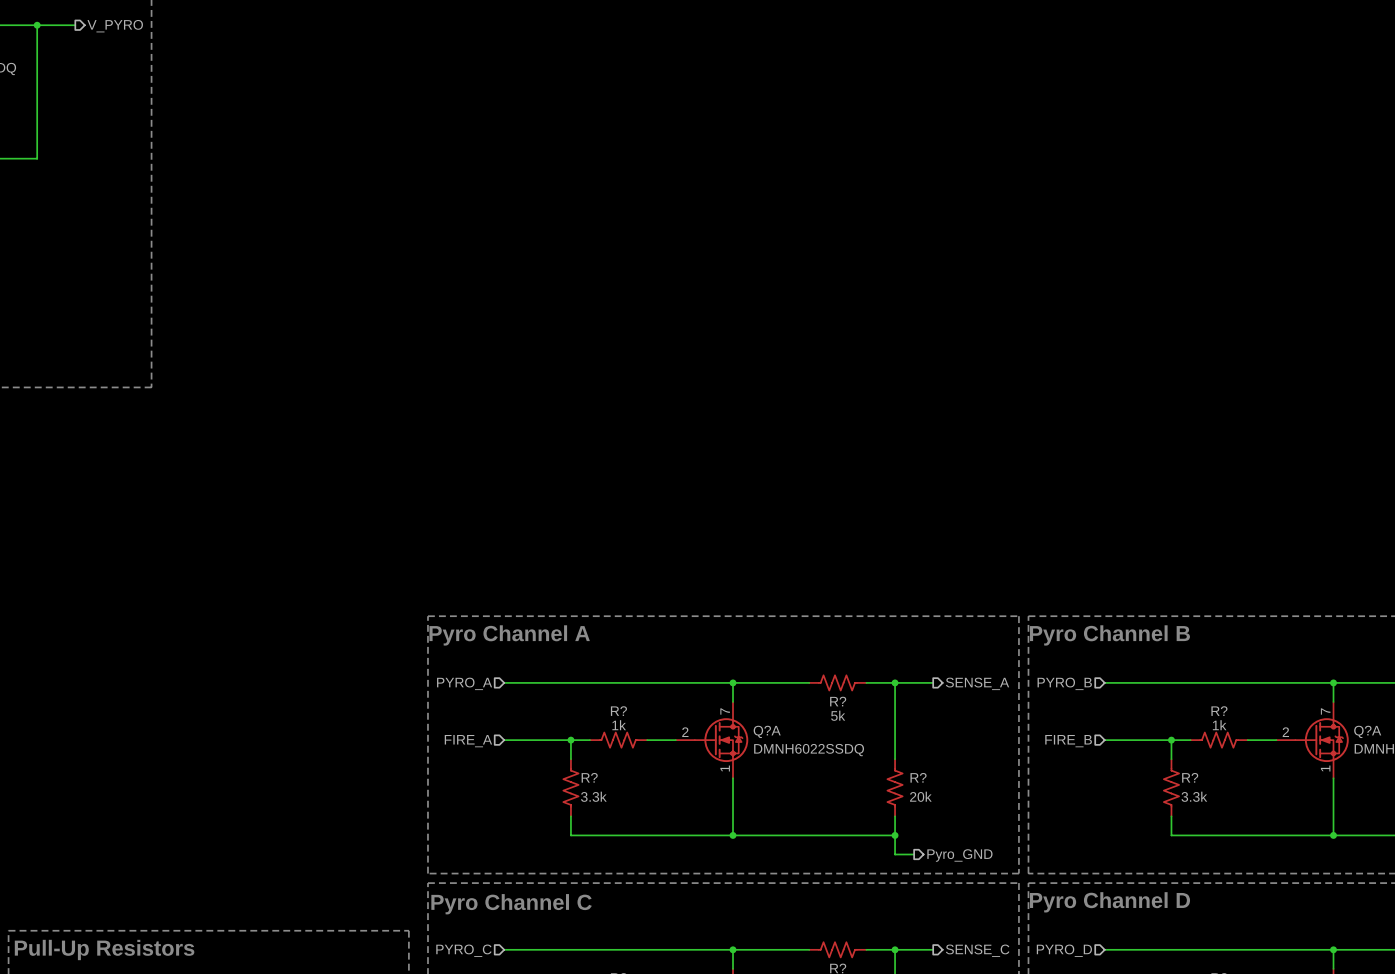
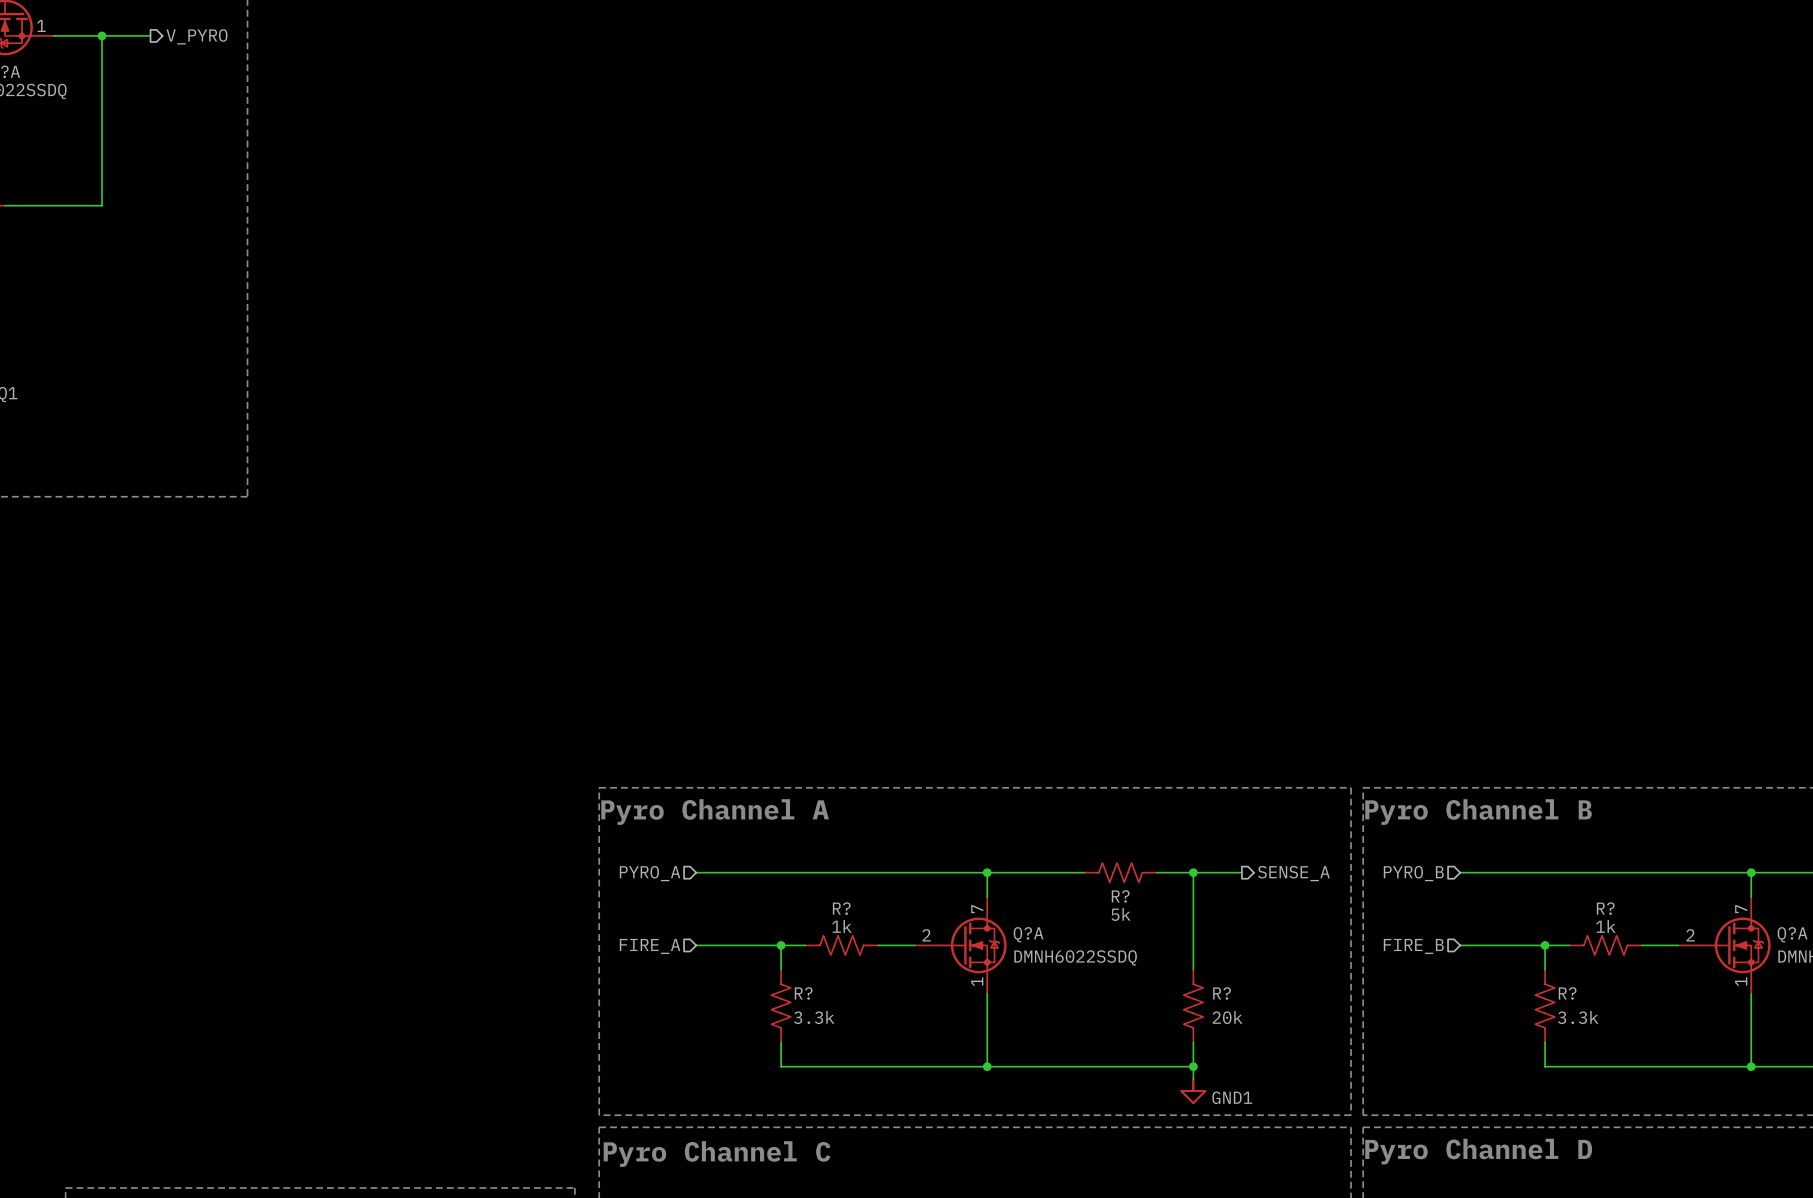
power symbol: none -> GND1 (1193, 1090)
power symbol: none -> (1193, 1090)
hierarchical label: Pyro_GND (959, 855) -> none

